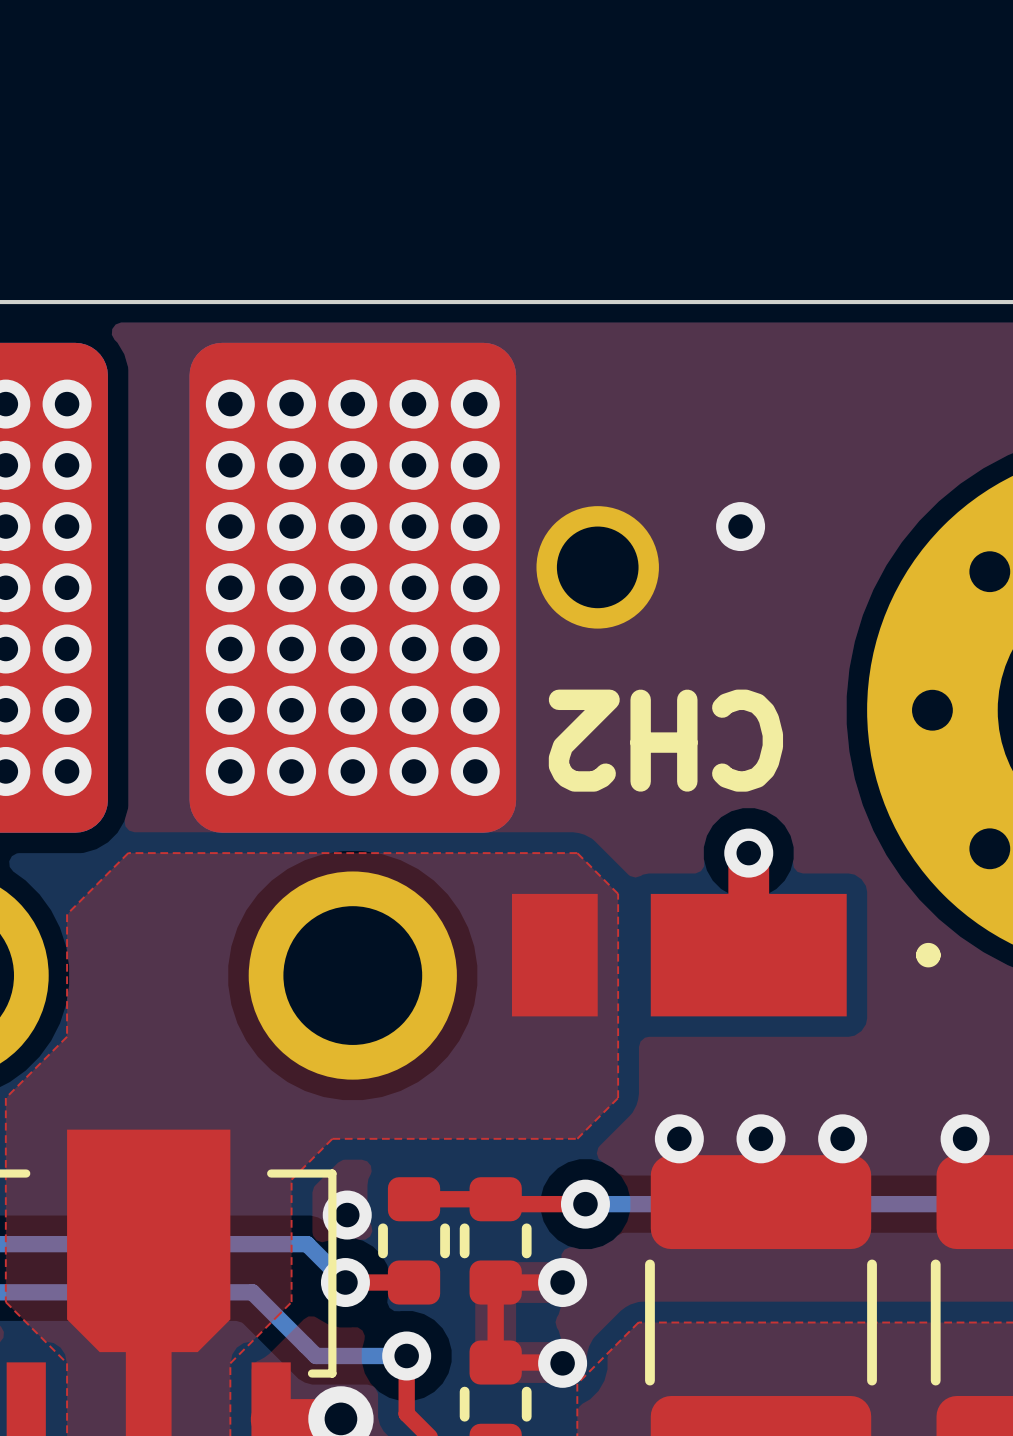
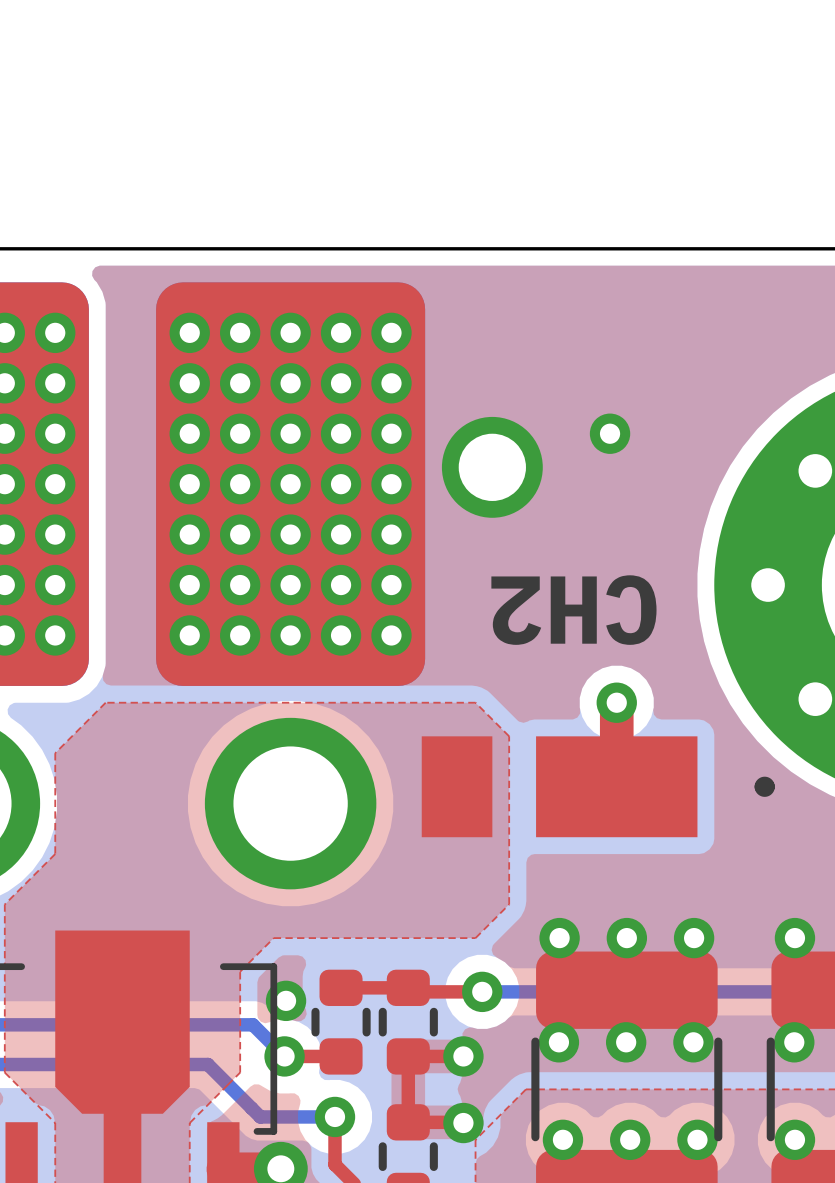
via: none -> (558, 1042)
via: none -> (626, 1042)
via: none -> (693, 1042)
via: none -> (794, 1042)
via: none -> (562, 1139)
via: none -> (630, 1139)
via: none -> (697, 1139)
via: none -> (794, 1139)

